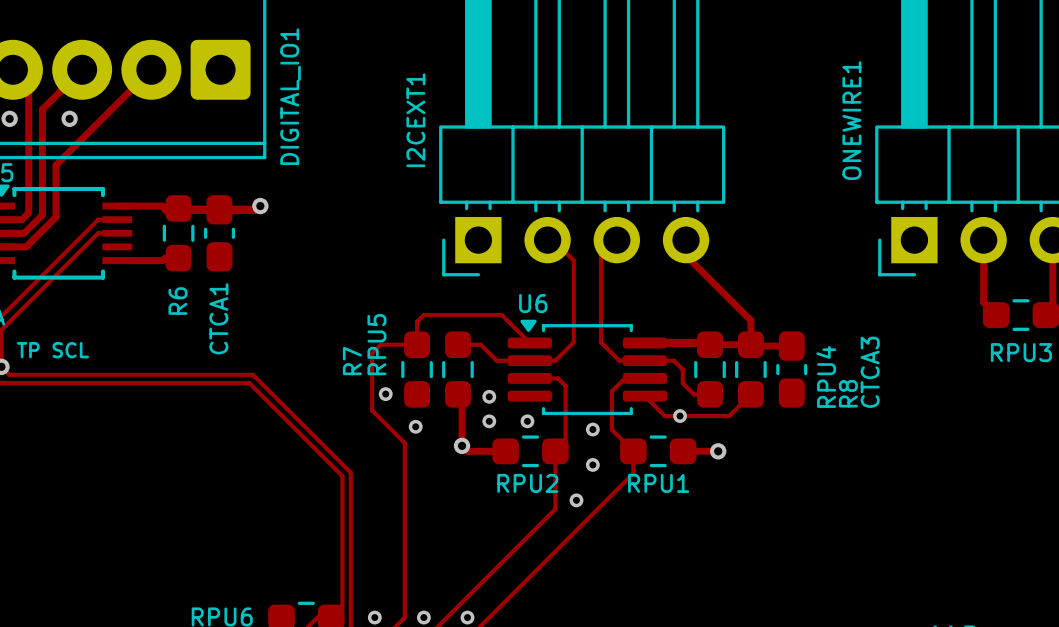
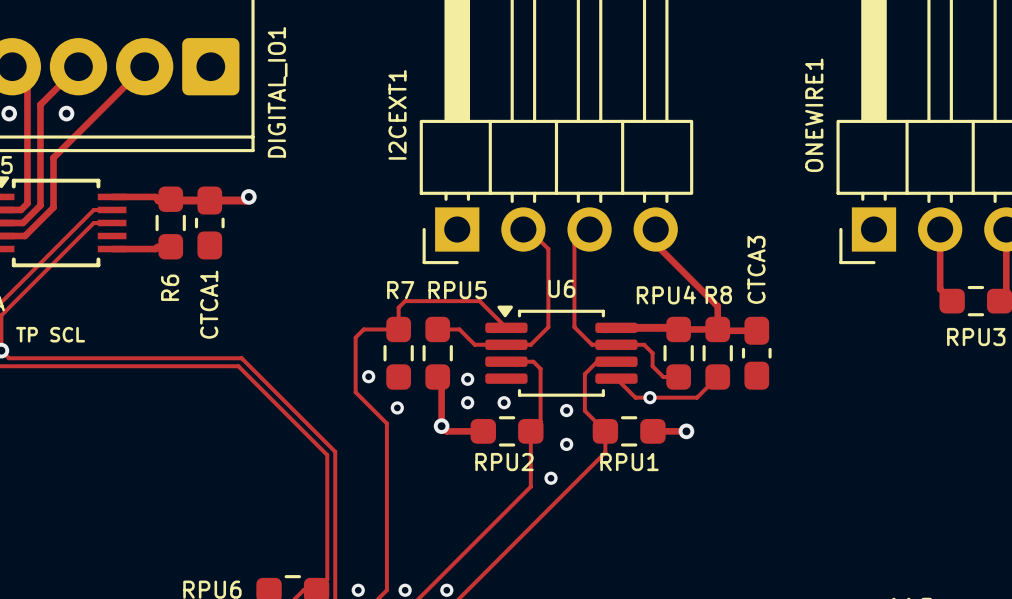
U6 name position: U6 (533, 303) -> U6 (561, 288)
RPU5 name rotation: 0° (376, 344) -> 90° clockwise (457, 290)
RPU5 name position: RPU5 (376, 344) -> RPU5 (457, 290)
R7 name rotation: 0° (352, 361) -> 90° clockwise (400, 290)
R7 name position: R7 (352, 361) -> R7 (400, 290)
CTCA3 name position: CTCA3 (870, 372) -> CTCA3 (756, 269)
RPU4 name rotation: 0° (826, 376) -> 90° clockwise (666, 294)
RPU4 name position: RPU4 (826, 376) -> RPU4 (666, 294)
R8 name rotation: 0° (848, 393) -> 90° clockwise (718, 295)
R8 name position: R8 (848, 393) -> R8 (718, 295)

